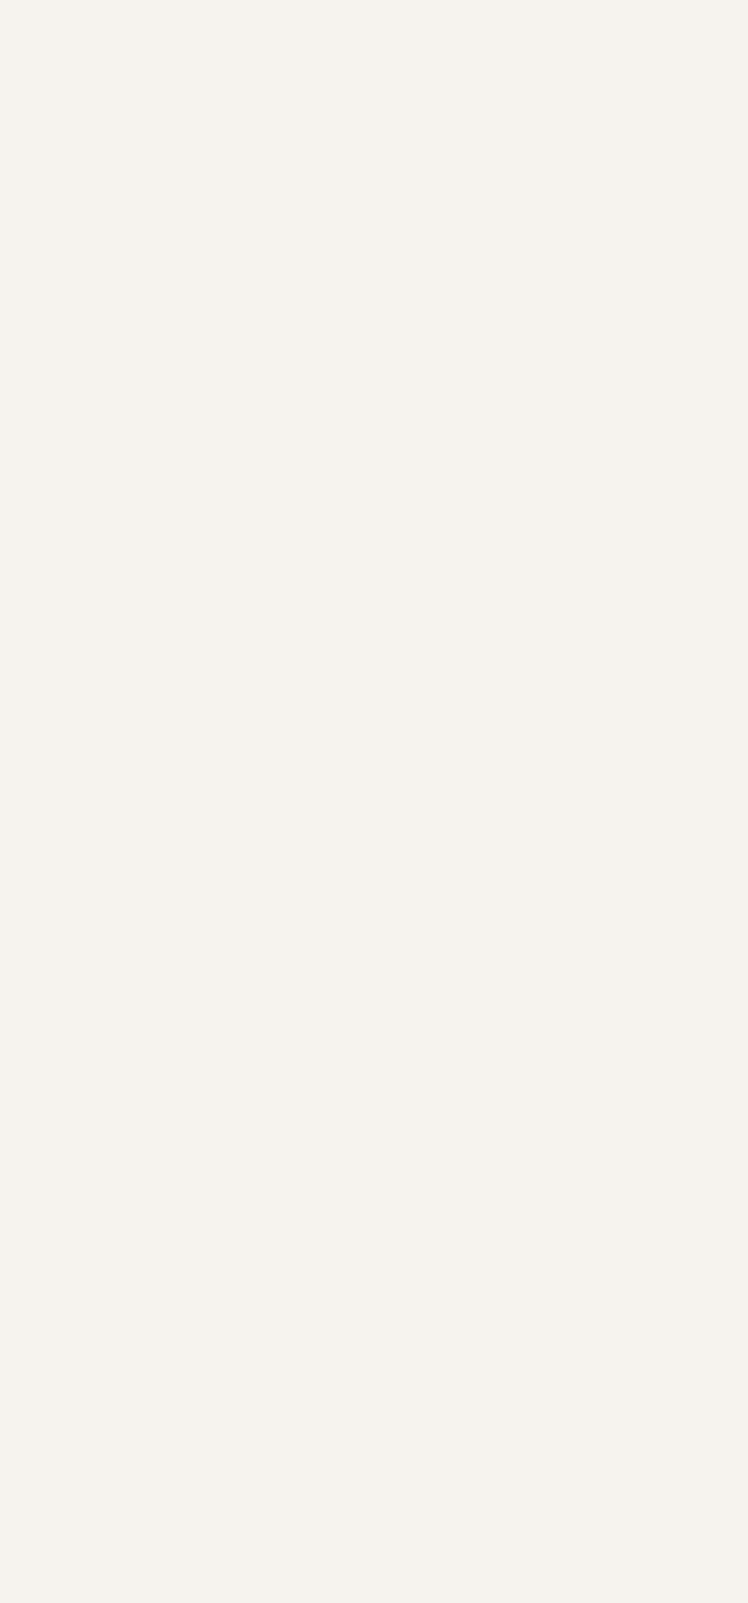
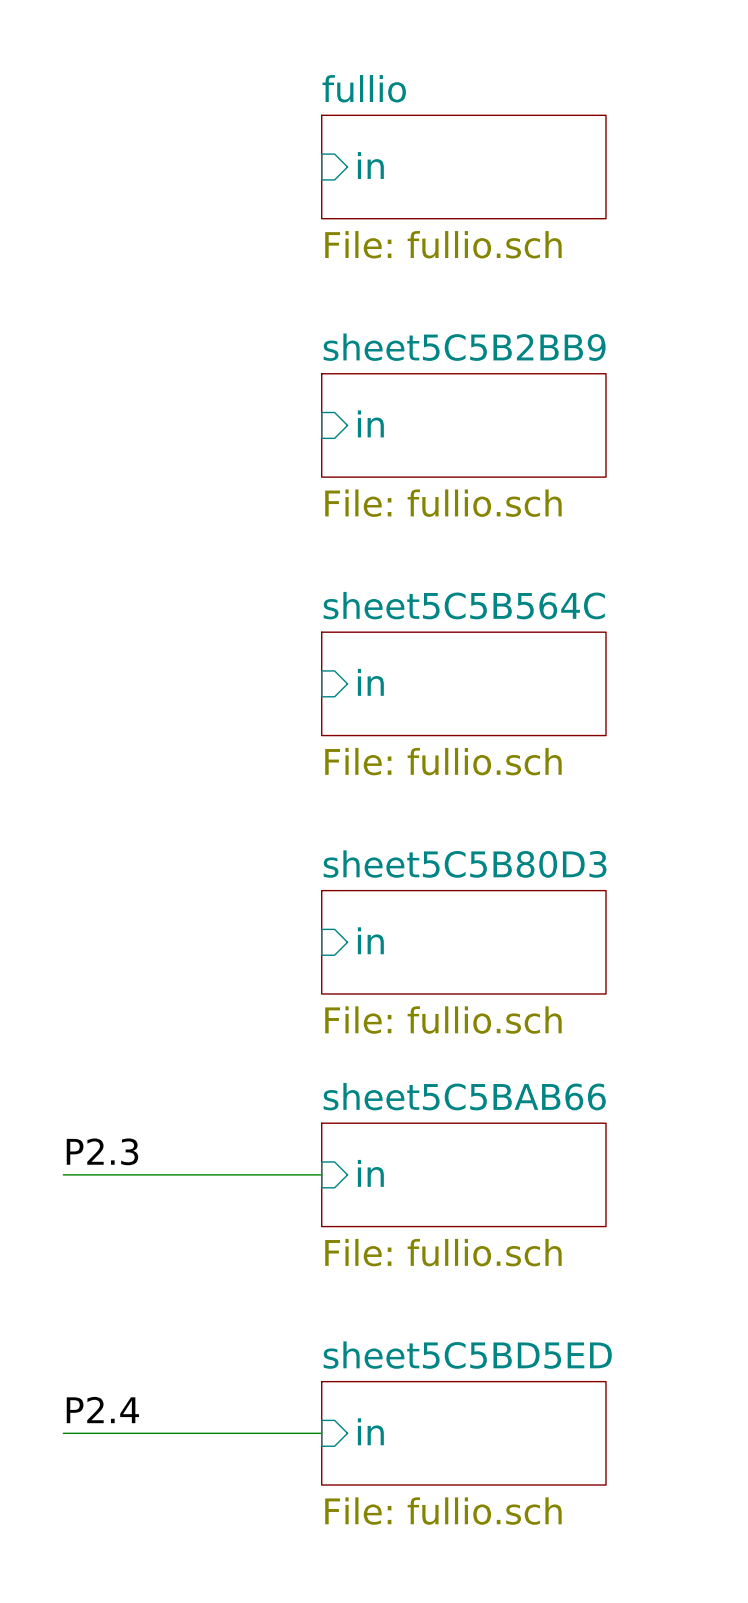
sheet pin: none -> in (370, 165)
sheet fullio: none -> File: fullio.sch (463, 167)
sheet pin: none -> in (370, 423)
sheet sheet5C5B2BB9: none -> File: fullio.sch (463, 425)
sheet pin: none -> in (370, 682)
sheet sheet5C5B564C: none -> File: fullio.sch (463, 683)
sheet pin: none -> in (370, 940)
sheet sheet5C5B80D3: none -> File: fullio.sch (463, 942)
label: none -> P2.3 (102, 1151)
wire: none -> (63, 1174) (321, 1174)
sheet pin: none -> in (370, 1173)
sheet sheet5C5BAB66: none -> File: fullio.sch (463, 1174)
label: none -> P2.4 (102, 1410)
sheet pin: none -> in (370, 1431)
wire: none -> (63, 1433) (321, 1433)
sheet sheet5C5BD5ED: none -> File: fullio.sch (463, 1433)

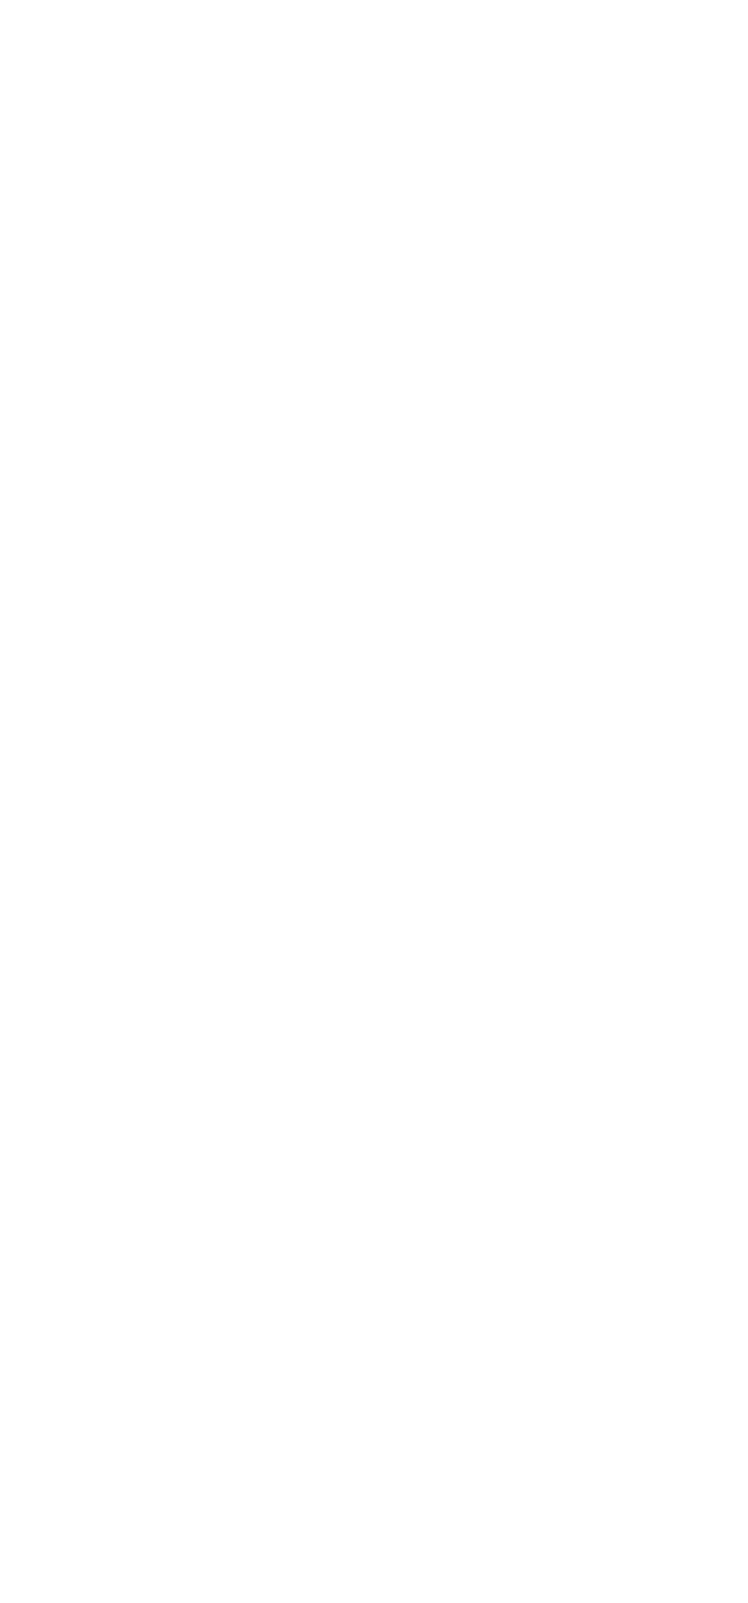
sheet pin: in (370, 165) -> none
sheet fullio: File: fullio.sch (463, 167) -> none
sheet pin: in (370, 423) -> none
sheet sheet5C5B2BB9: File: fullio.sch (463, 425) -> none
sheet pin: in (370, 682) -> none
sheet sheet5C5B564C: File: fullio.sch (463, 683) -> none
sheet pin: in (370, 940) -> none
sheet sheet5C5B80D3: File: fullio.sch (463, 942) -> none
label: P2.3 (102, 1151) -> none
sheet pin: in (370, 1173) -> none
wire: (63, 1174) (321, 1174) -> none
sheet sheet5C5BAB66: File: fullio.sch (463, 1174) -> none
label: P2.4 (102, 1410) -> none
sheet pin: in (370, 1431) -> none
wire: (63, 1433) (321, 1433) -> none
sheet sheet5C5BD5ED: File: fullio.sch (463, 1433) -> none

